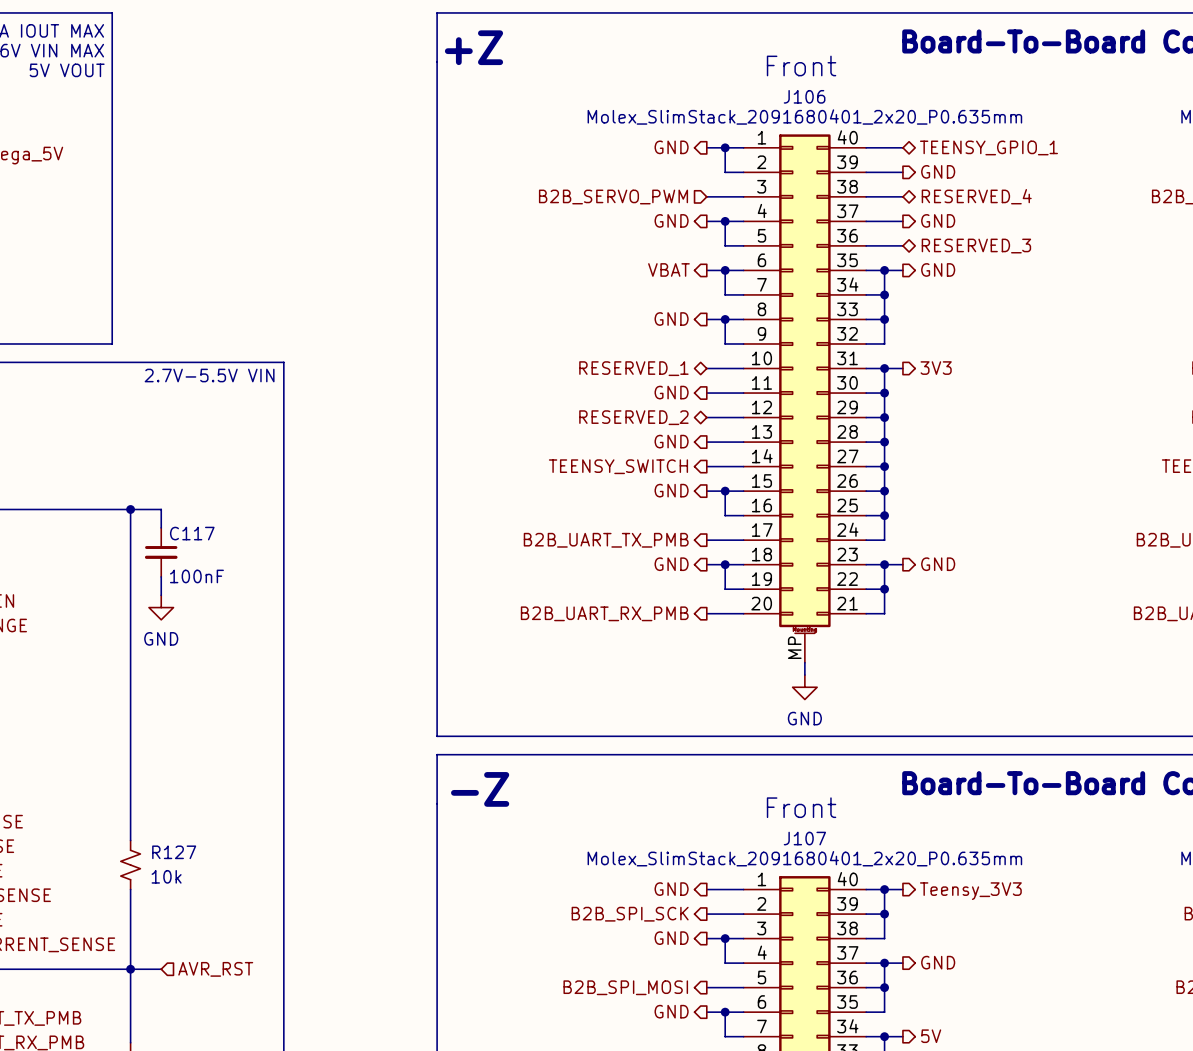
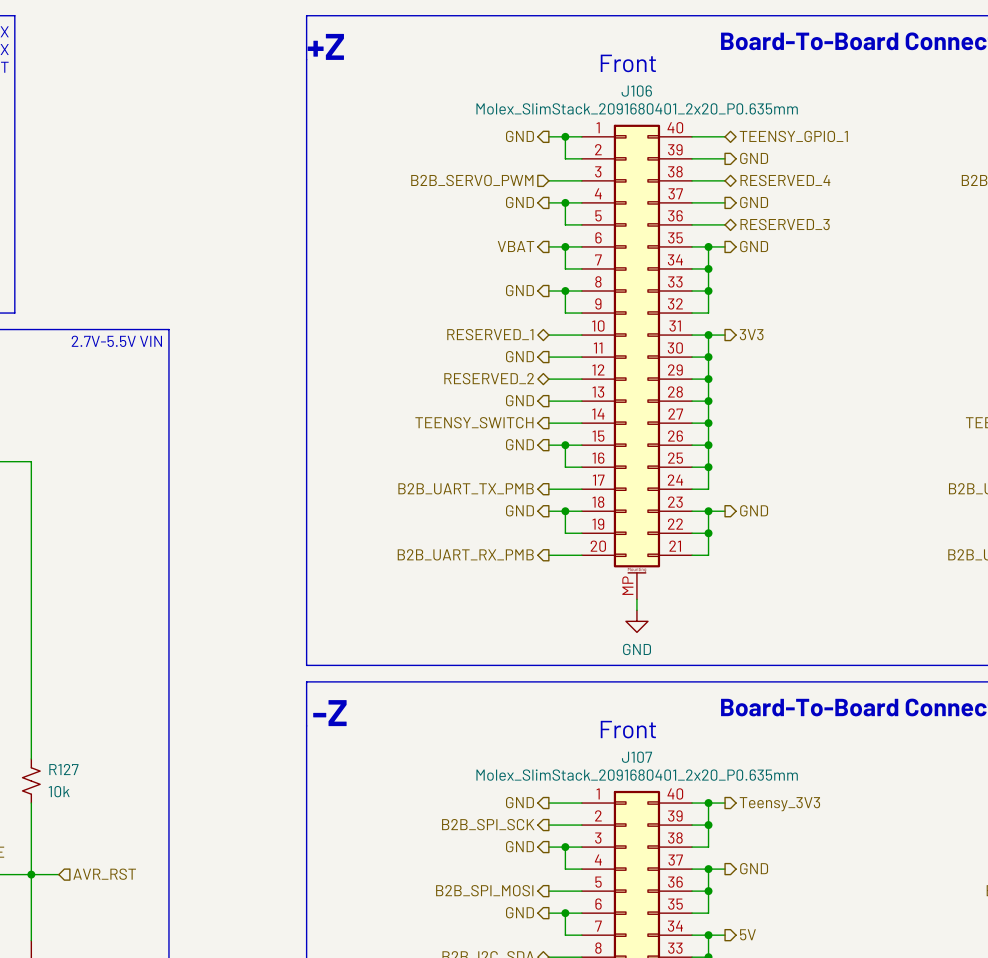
wire: (130, 509) (161, 509) (161, 527) -> none
junction: (130, 509) -> none
C117: 100nF (161, 552) -> none
wire: (161, 576) (161, 595) -> none
power symbol: GND (161, 607) -> none

